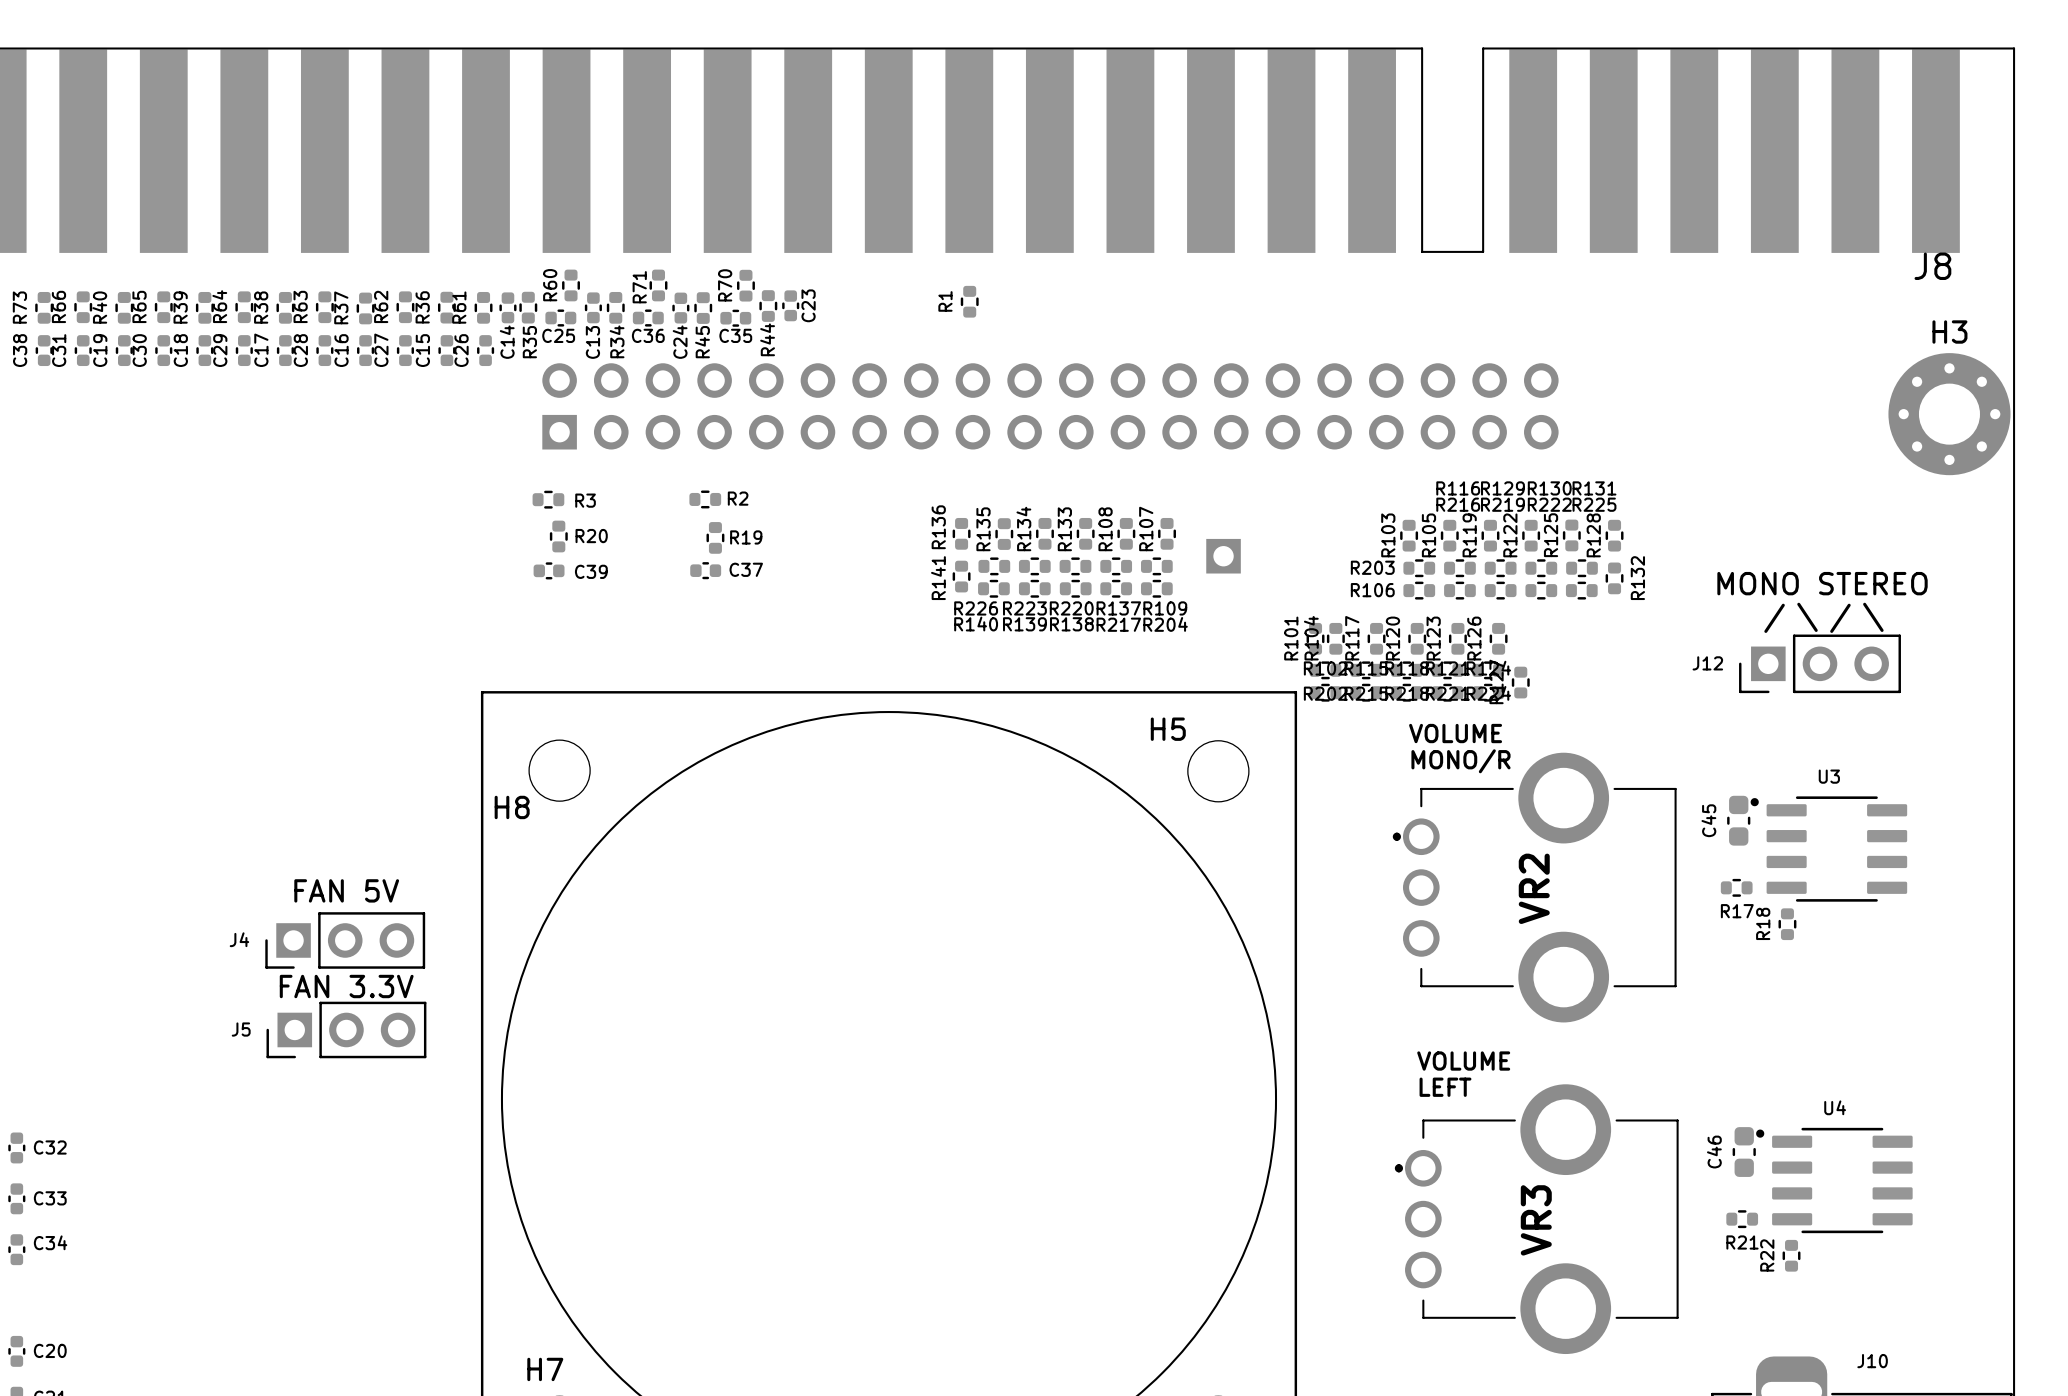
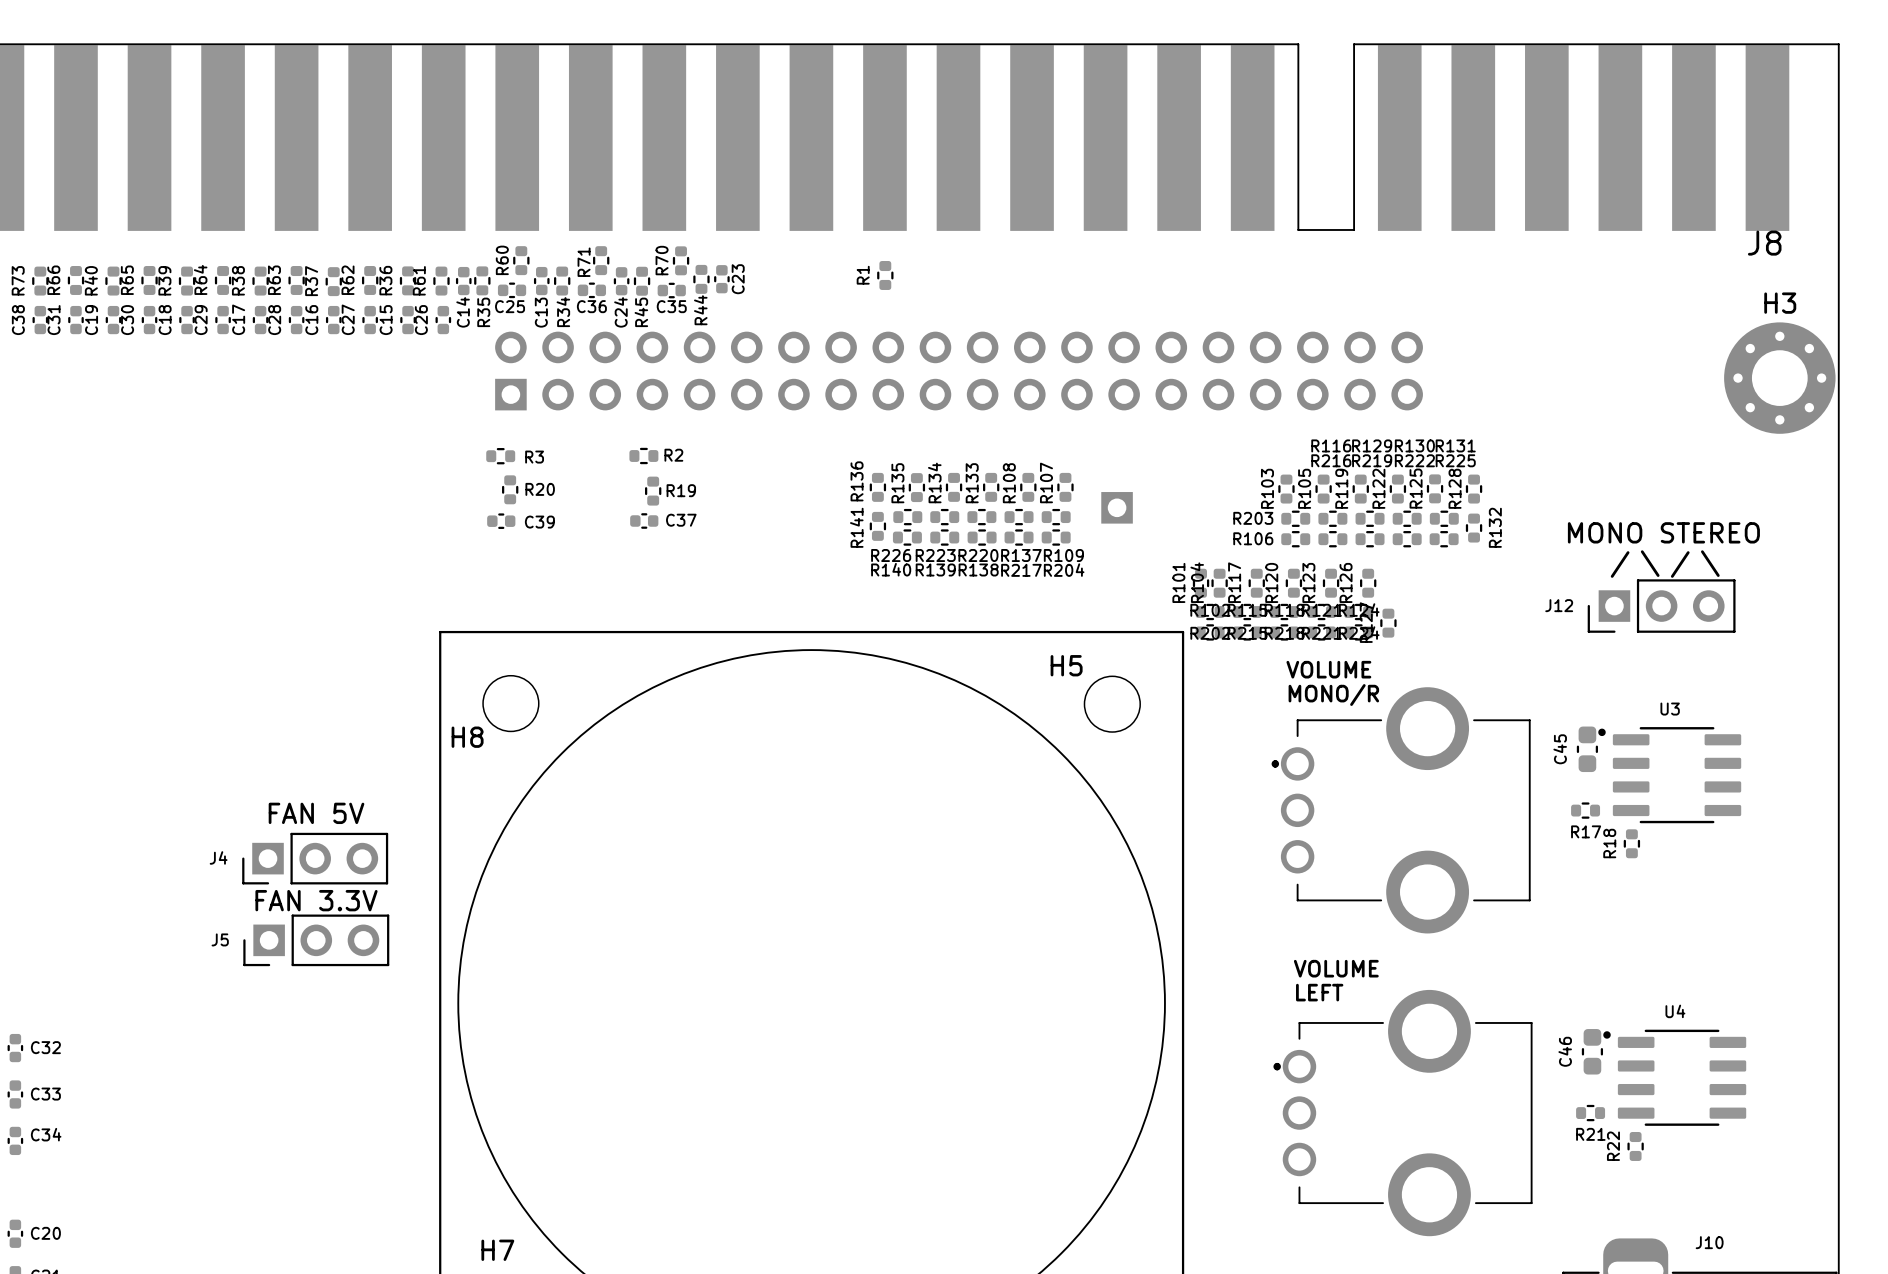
VR2 name: VR2 (1534, 888) -> none
VR3 name: VR3 (1536, 1220) -> none

